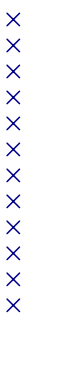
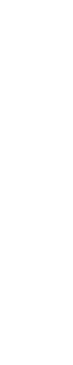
no-connect mark: (13, 19) -> none
no-connect mark: (13, 45) -> none
no-connect mark: (13, 71) -> none
no-connect mark: (13, 97) -> none
no-connect mark: (13, 123) -> none
no-connect mark: (13, 149) -> none
no-connect mark: (13, 175) -> none
no-connect mark: (13, 201) -> none
no-connect mark: (13, 227) -> none
no-connect mark: (13, 253) -> none
no-connect mark: (13, 279) -> none
no-connect mark: (13, 305) -> none

